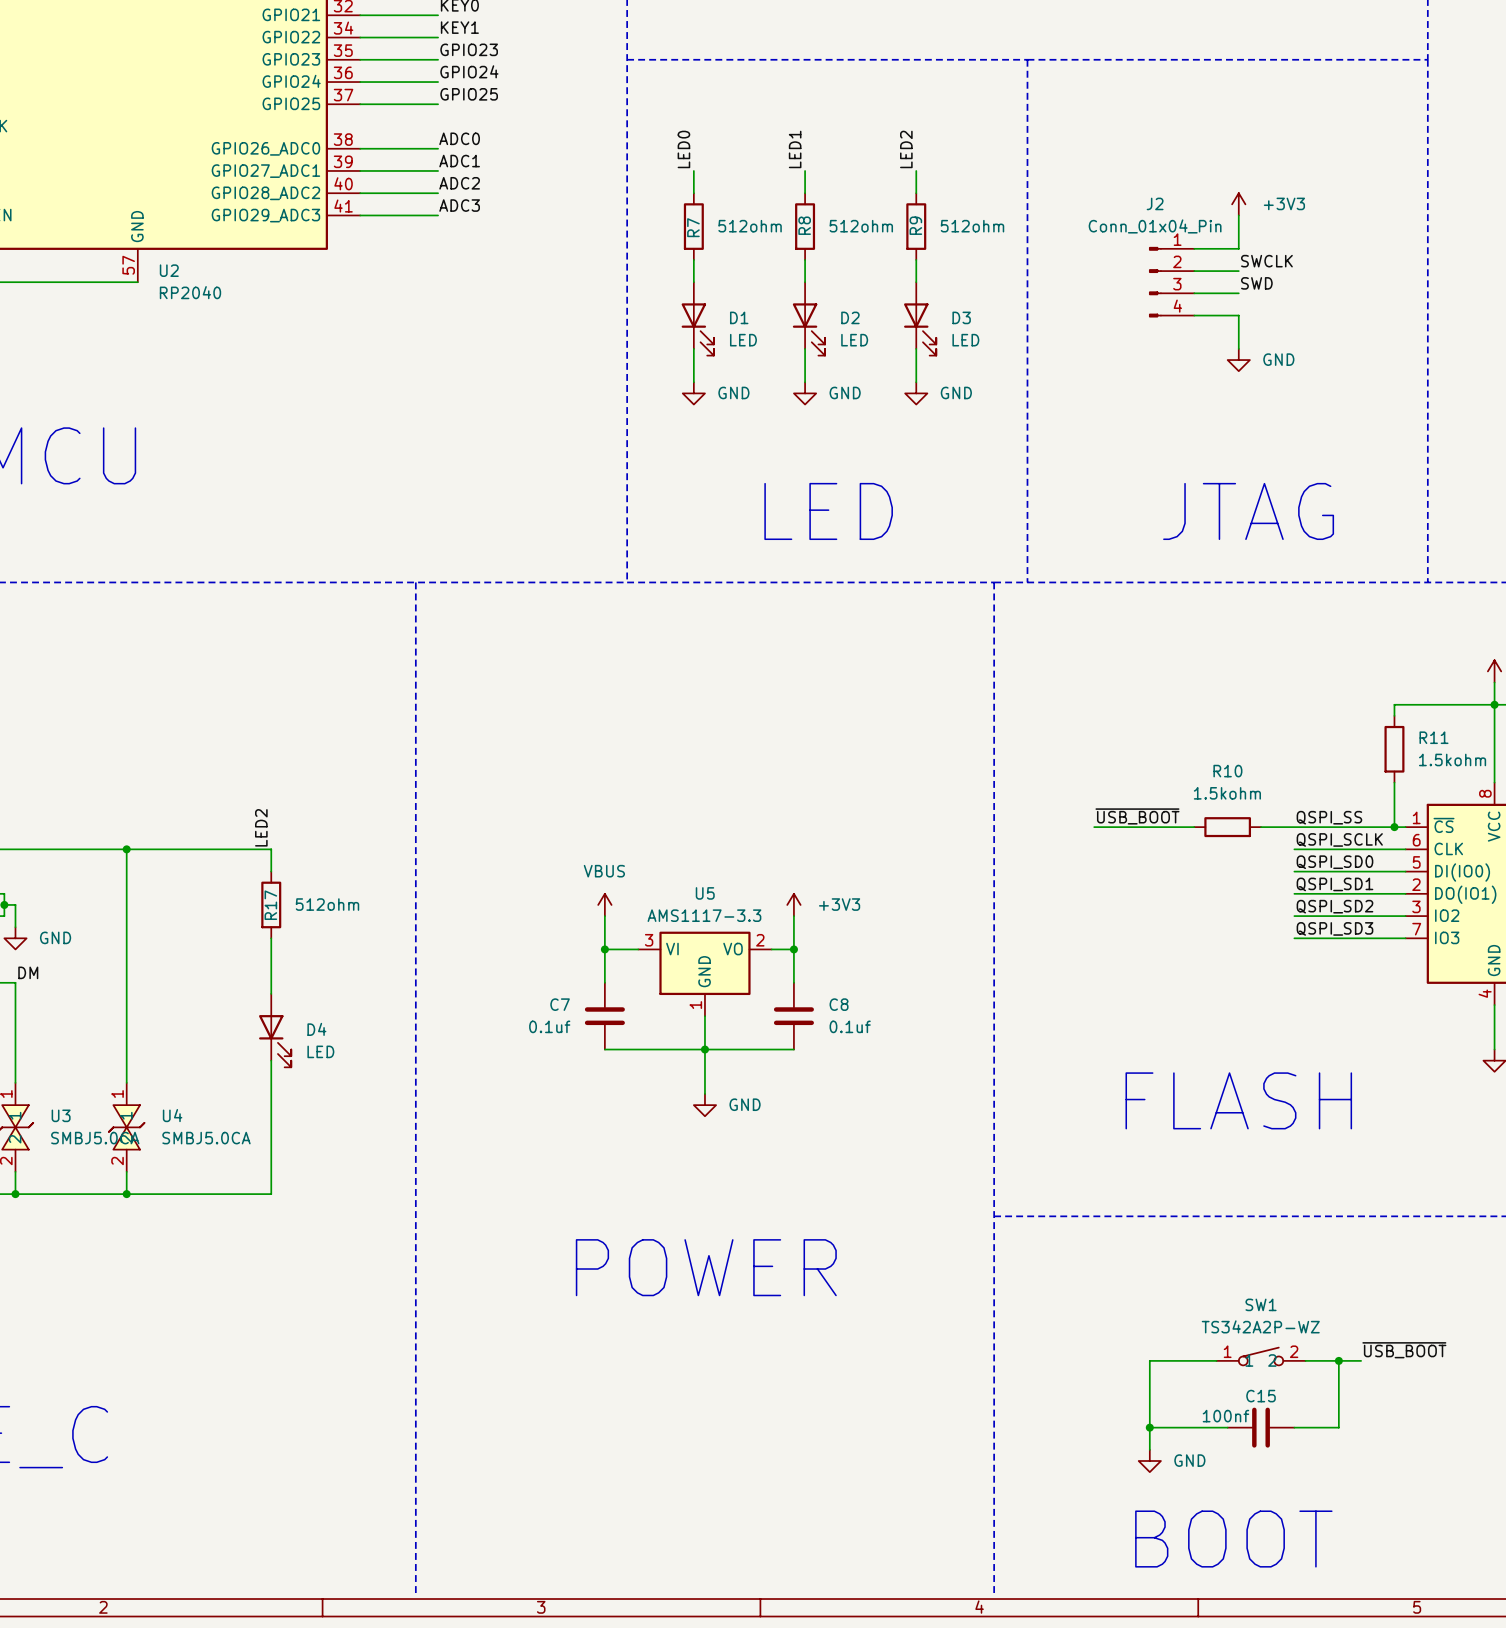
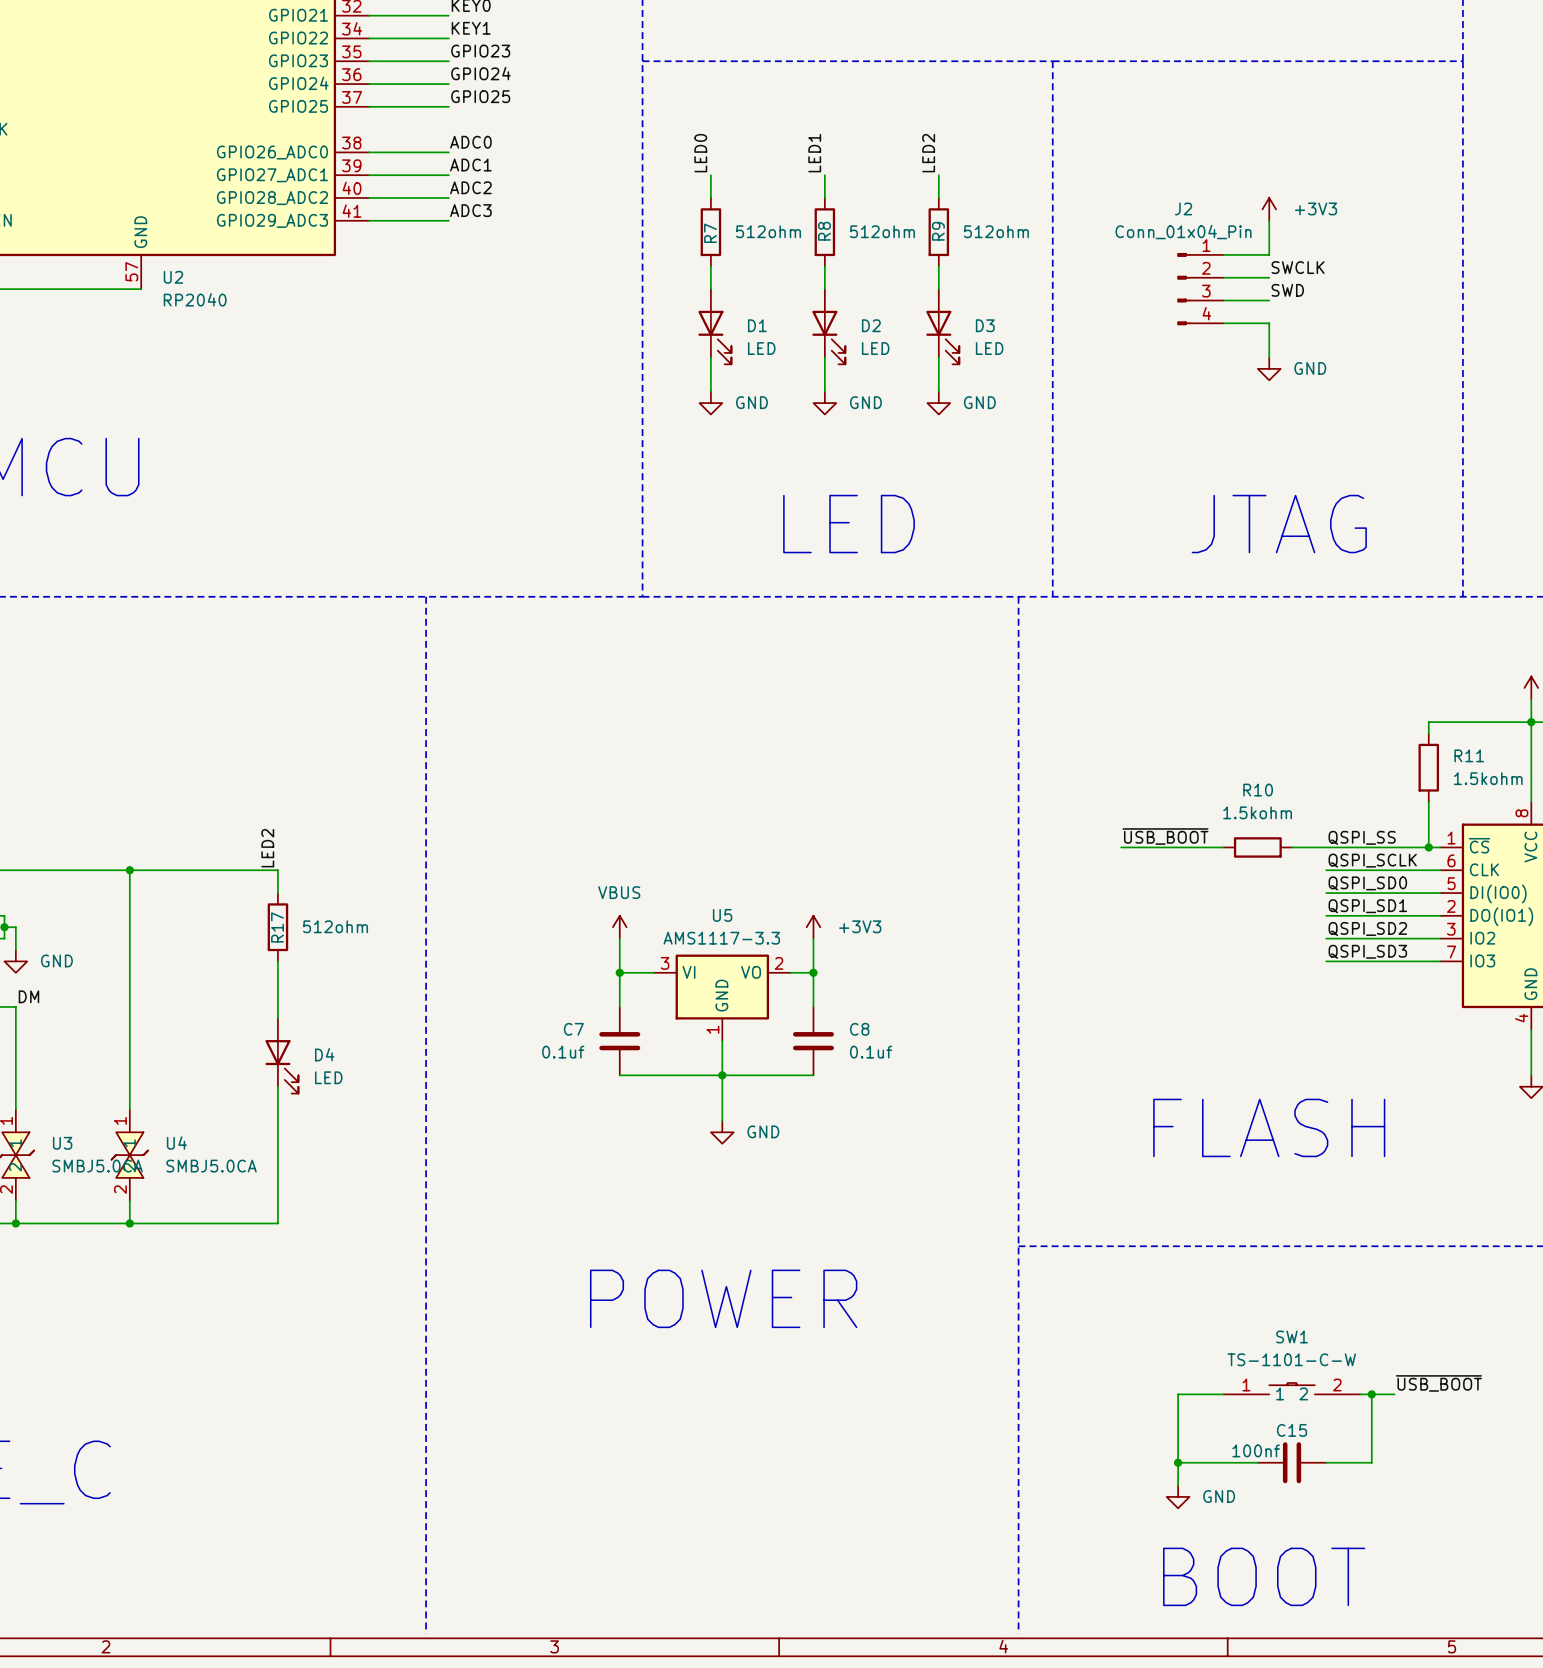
SW1 value: TS342A2P-WZ (1260, 1326) -> TS-1101-C-W (1291, 1359)
SW1 symbol: [1216, 1347, 1306, 1366] -> [1223, 1382, 1361, 1395]

